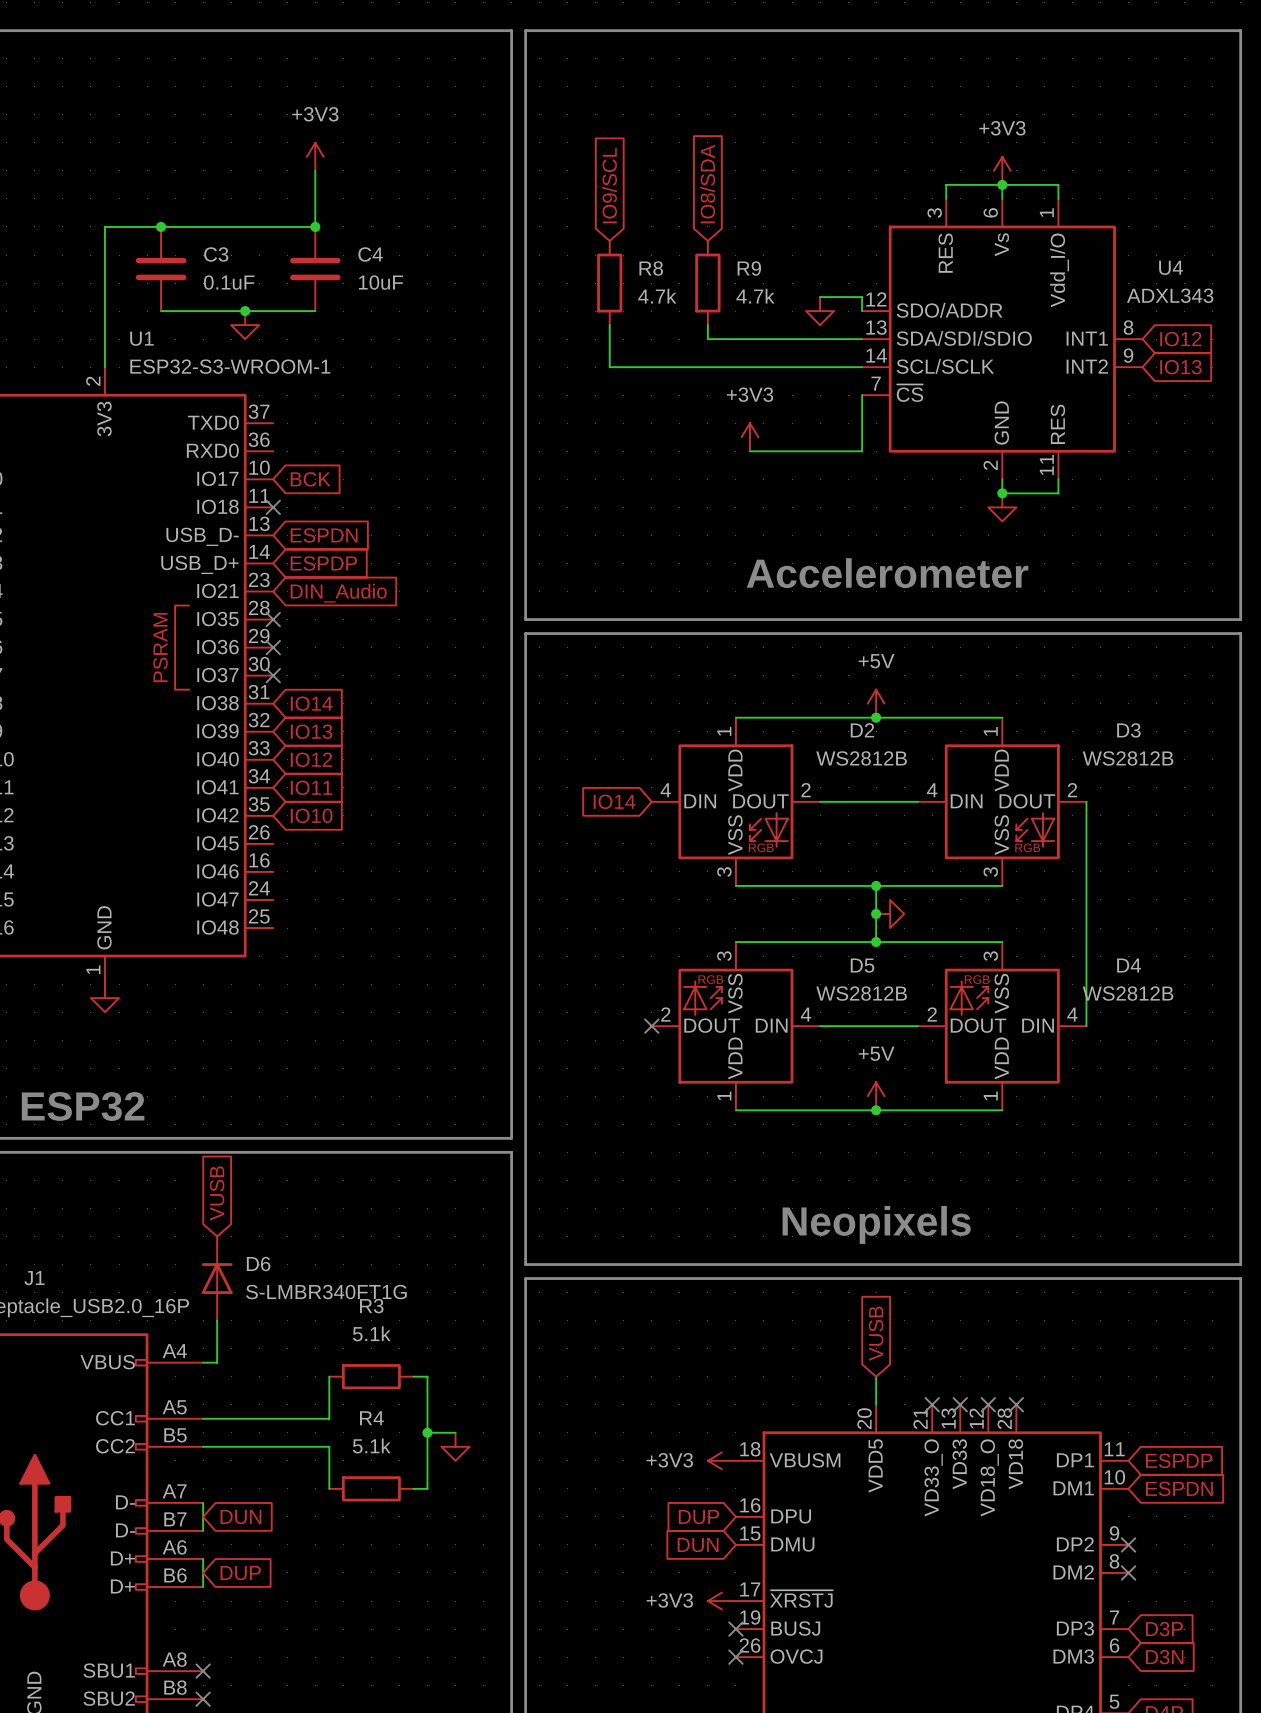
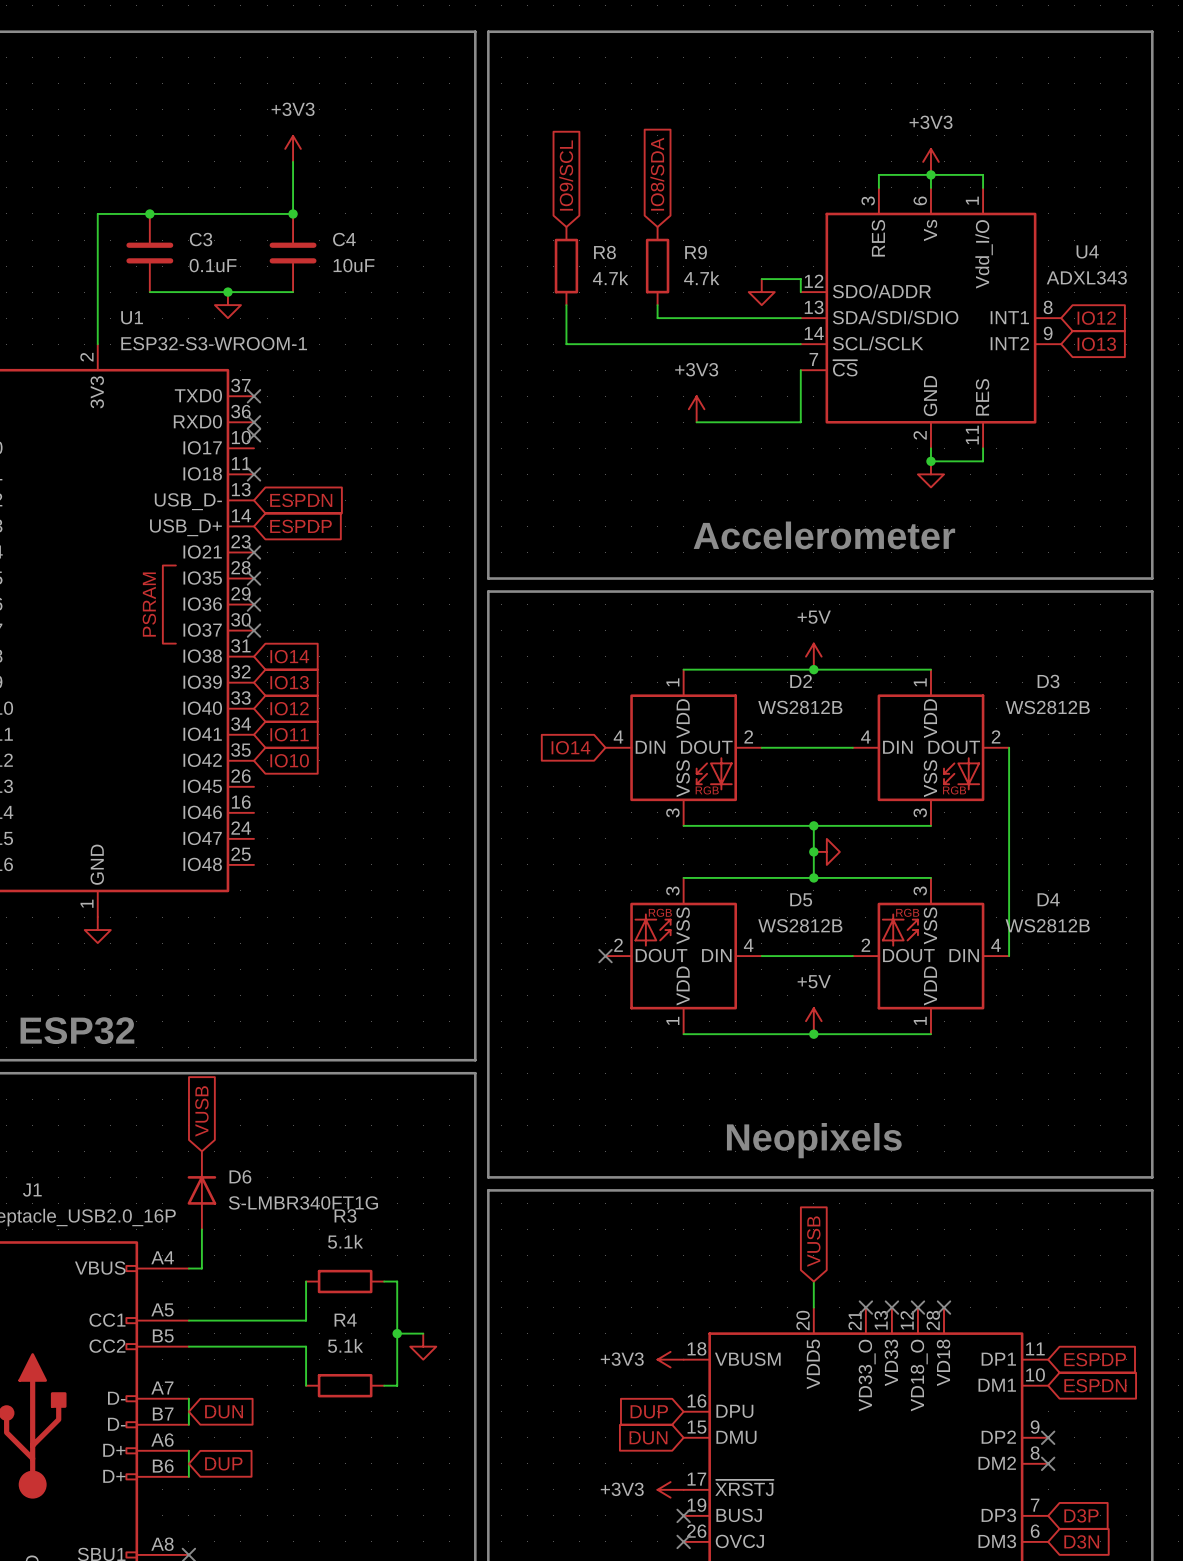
no-connect mark: none -> (253, 396)
no-connect mark: none -> (253, 422)
no-connect mark: none -> (253, 435)
global label: BCK (310, 479) -> none
no-connect mark: none -> (253, 552)
global label: DIN_Audio (338, 593) -> none

